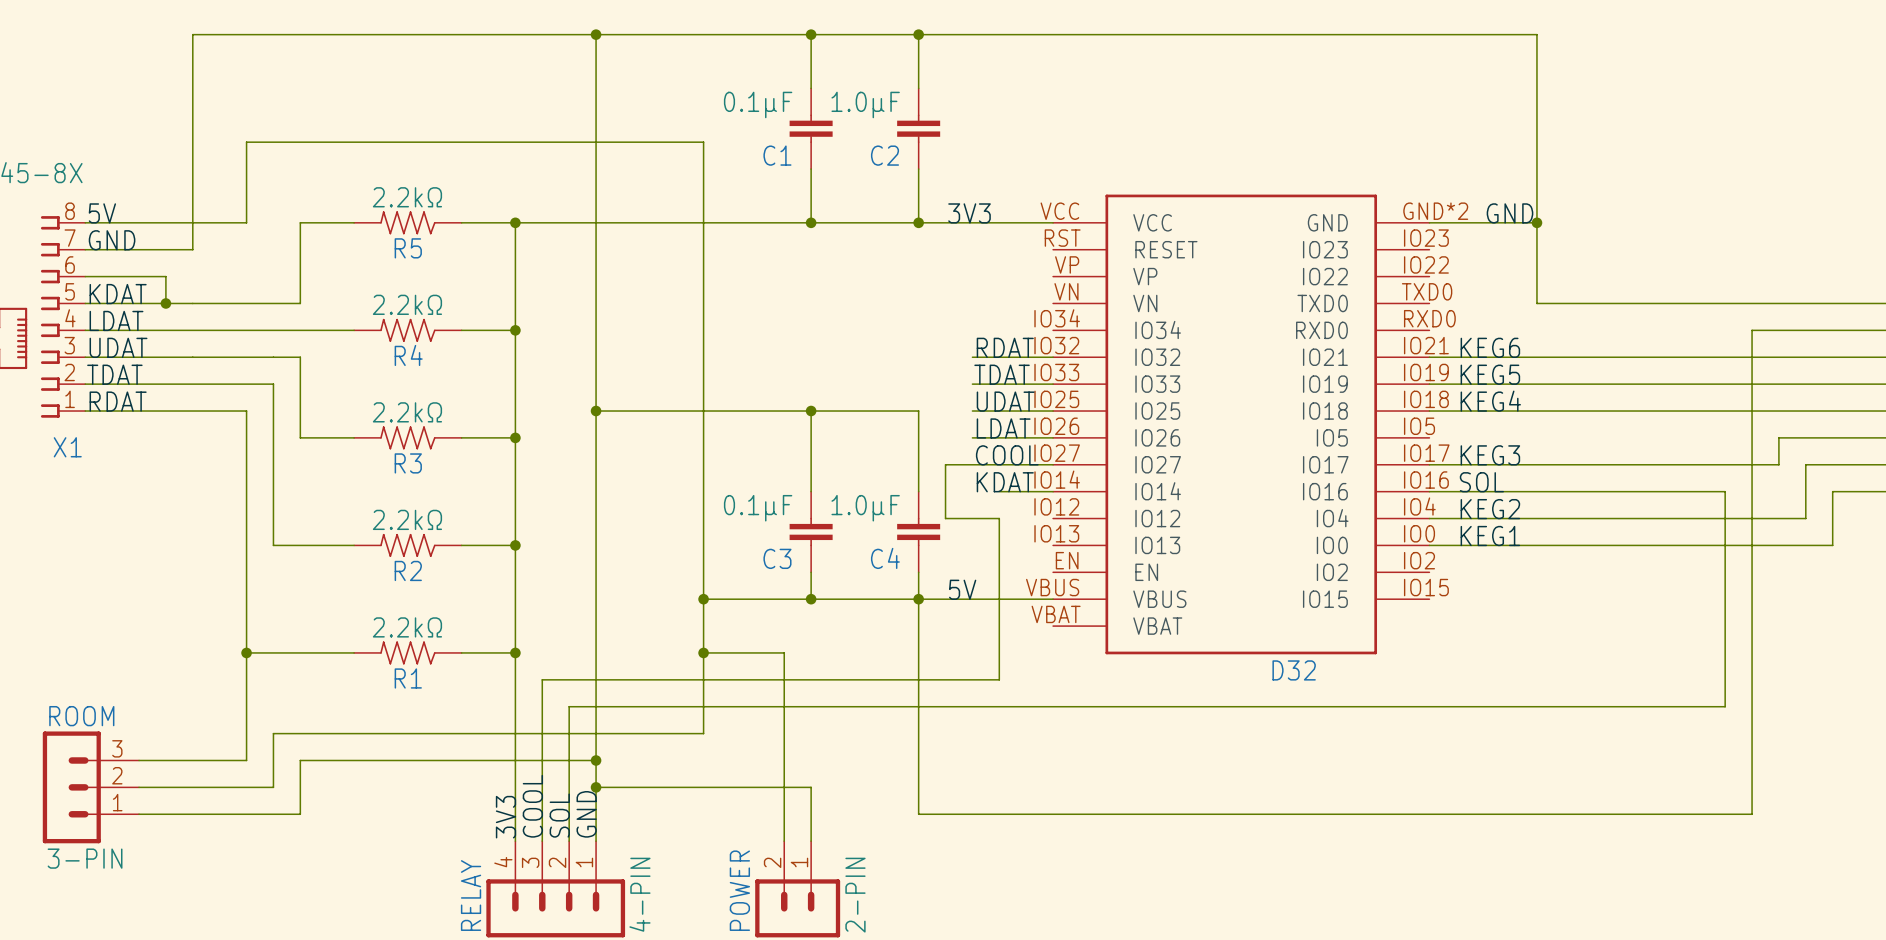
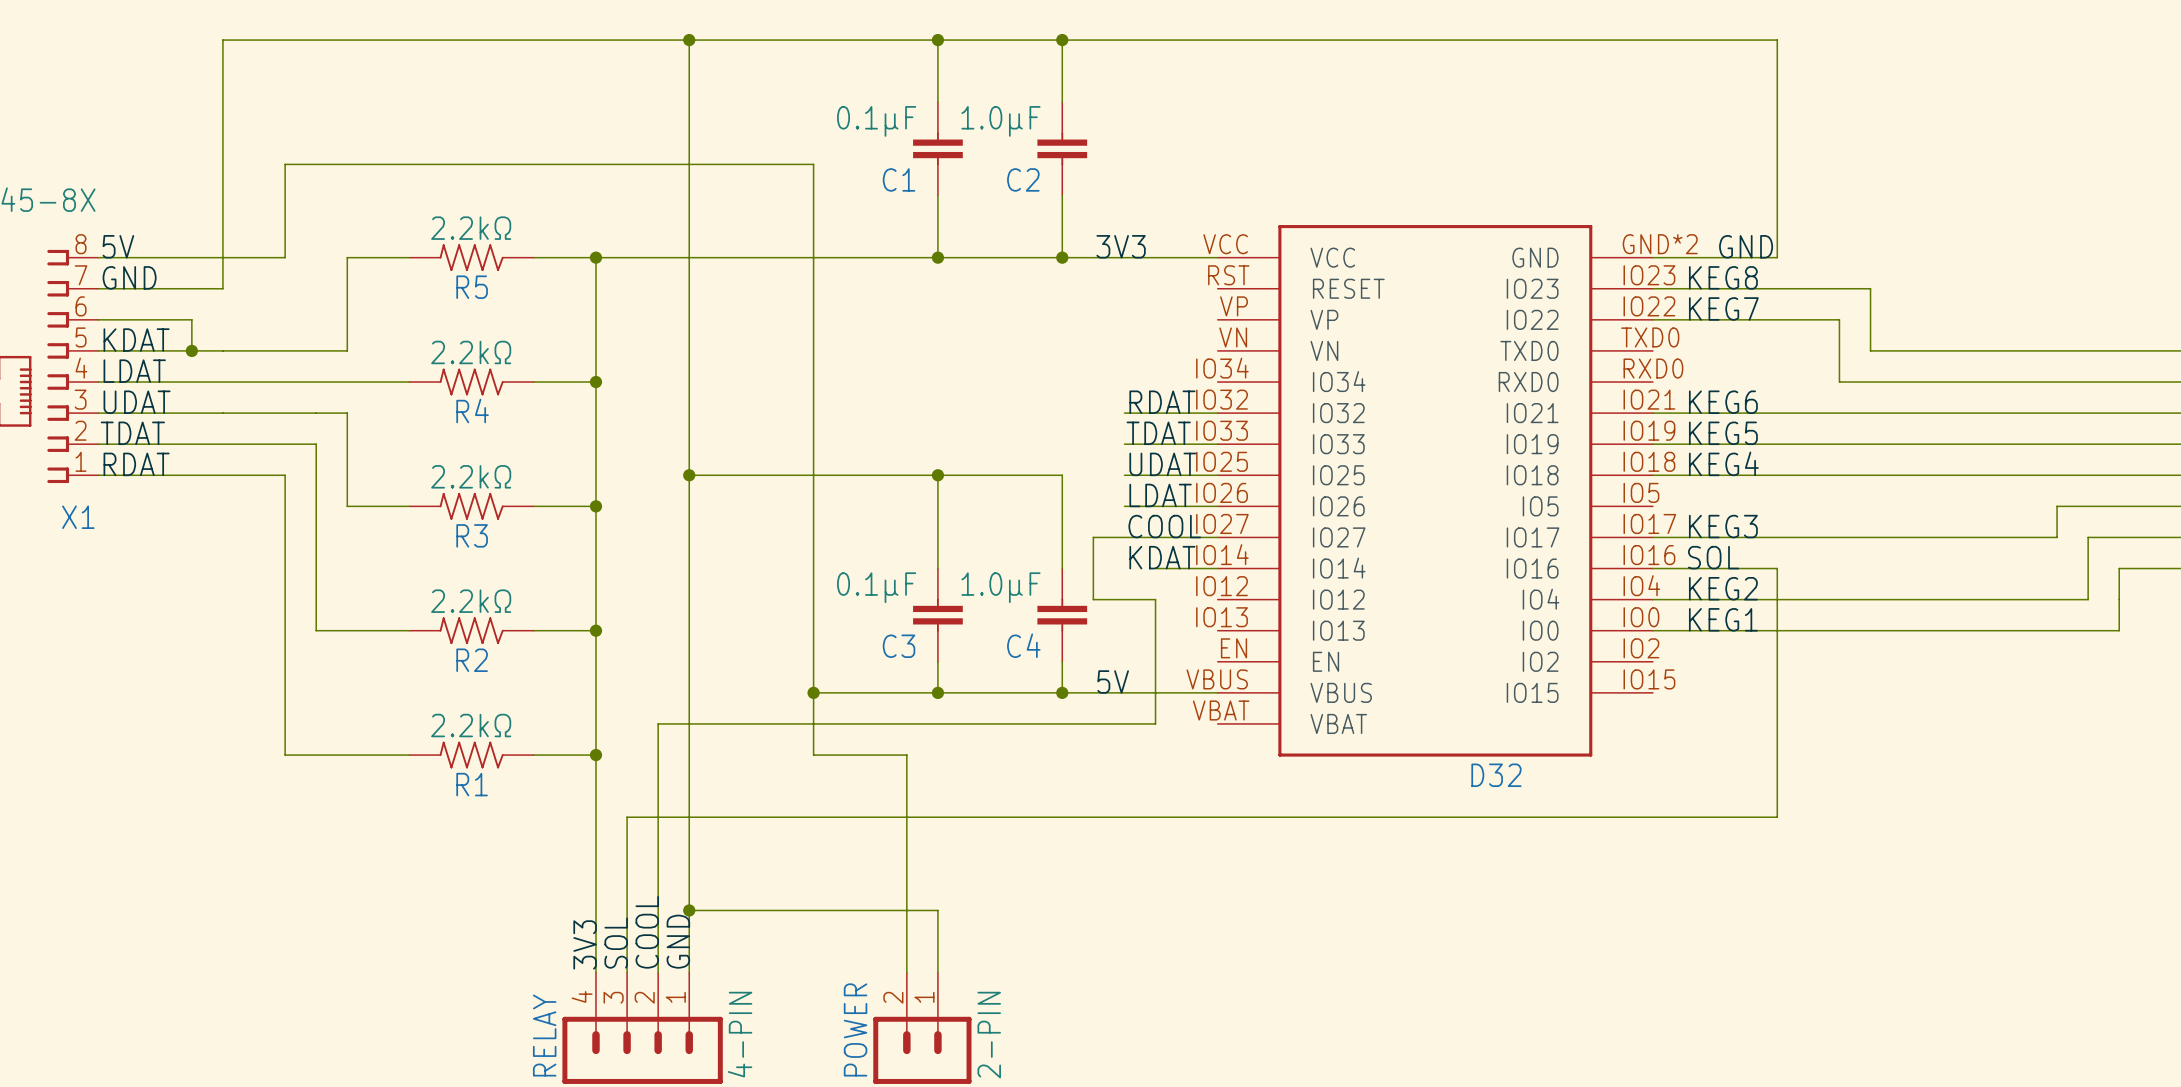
wire: (1536, 222) (1536, 303) (1617, 303) -> (1652, 288) (1870, 288) (1870, 350)
junction: (1536, 222) -> none
label: none -> KEG8 (1723, 277)
label: none -> KEG7 (1723, 308)
wire: (1752, 330) (1752, 814) (918, 814) (918, 599) -> (2025, 382) (1839, 382) (1839, 319) (1652, 319)
wire: (1536, 491) (1725, 491) (1725, 706) (1536, 706) -> (1777, 568) (1777, 817)
wire: (999, 626) (999, 679) (542, 679) (542, 706) -> (1155, 723) (658, 723) (658, 817) (627, 817)
wire: (246, 652) (246, 760) (139, 760) -> none
junction: (246, 652) -> none
wire: (703, 652) (703, 733) (273, 733) (273, 787) (139, 787) -> none
junction: (703, 652) -> none
wire: (596, 760) (300, 760) (300, 814) (139, 814) -> none
junction: (596, 760) -> none
ROOM: 3-PIN (90, 787) -> none
label: COOL (532, 806) -> SOL (616, 943)
label: SOL (559, 815) -> COOL (647, 932)

